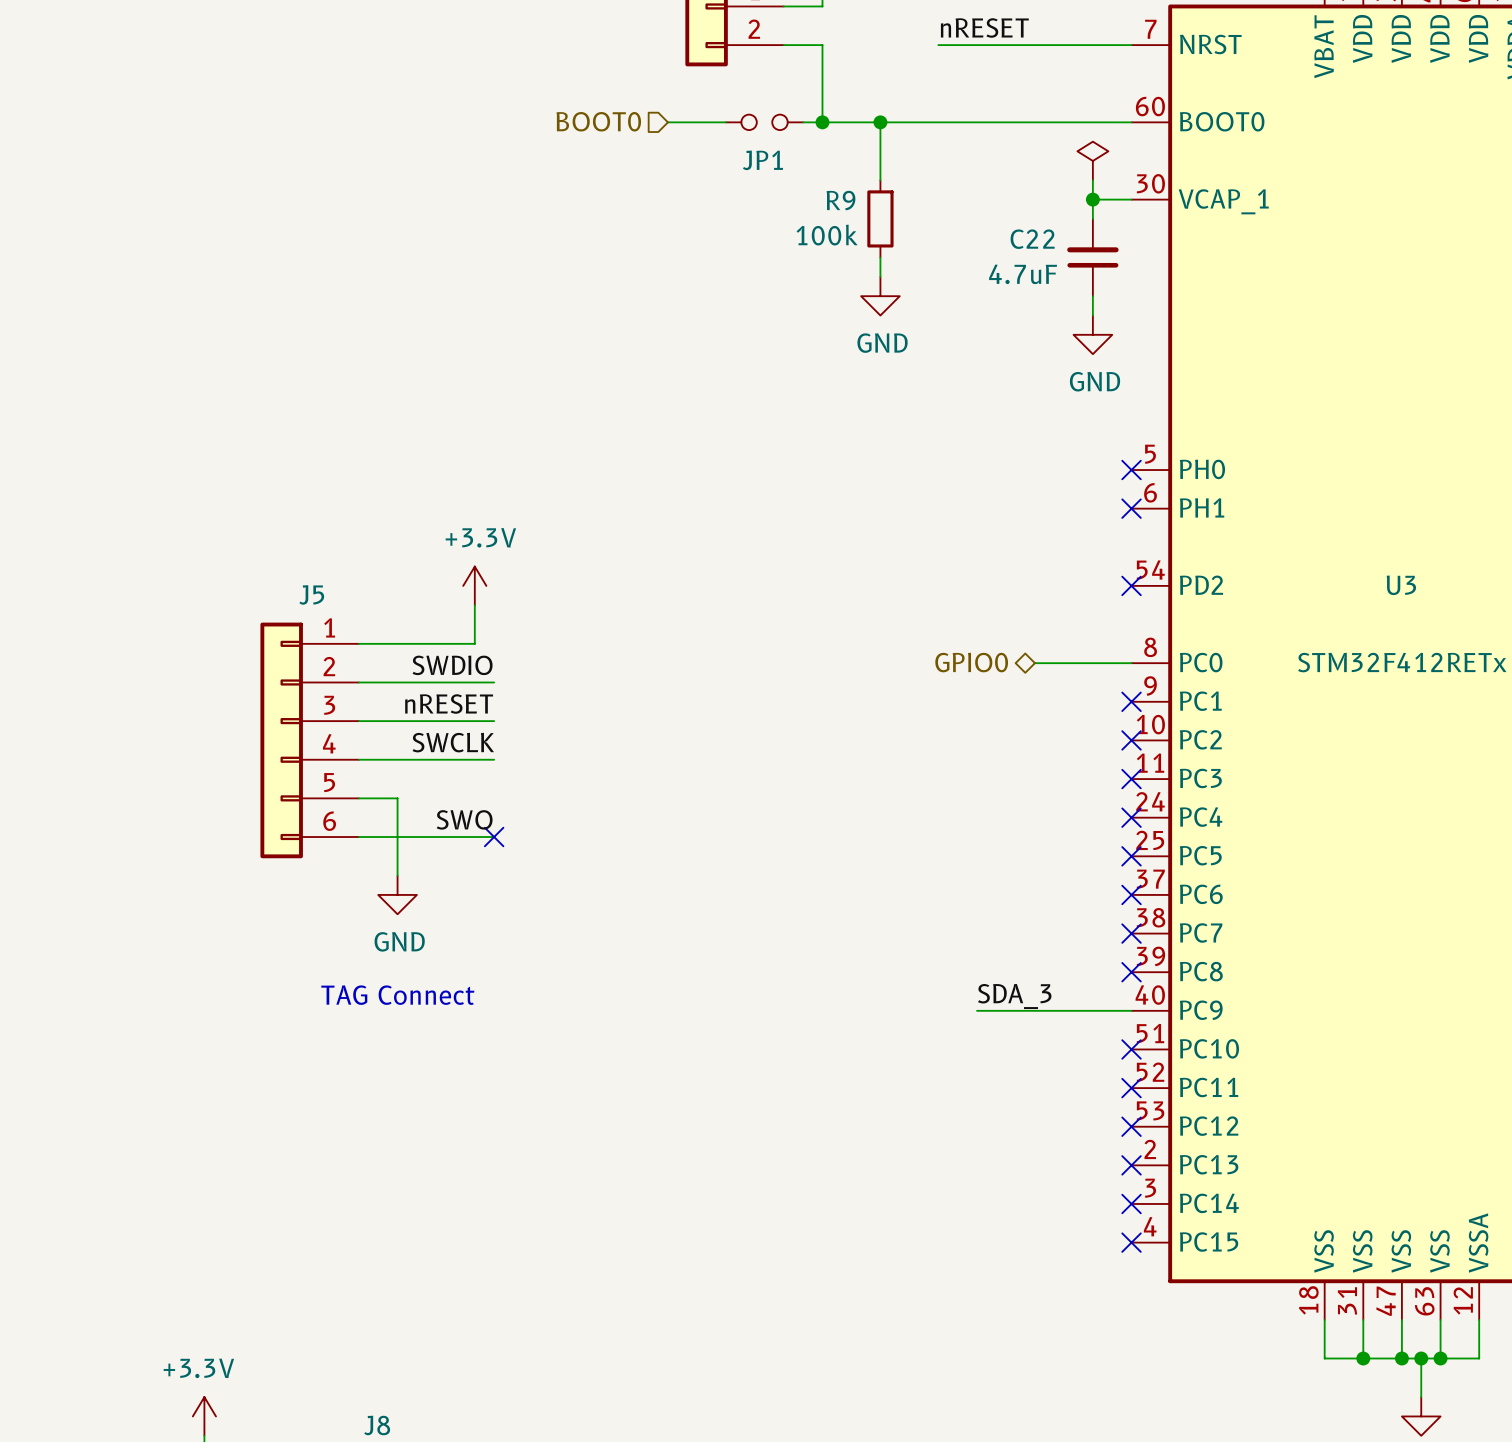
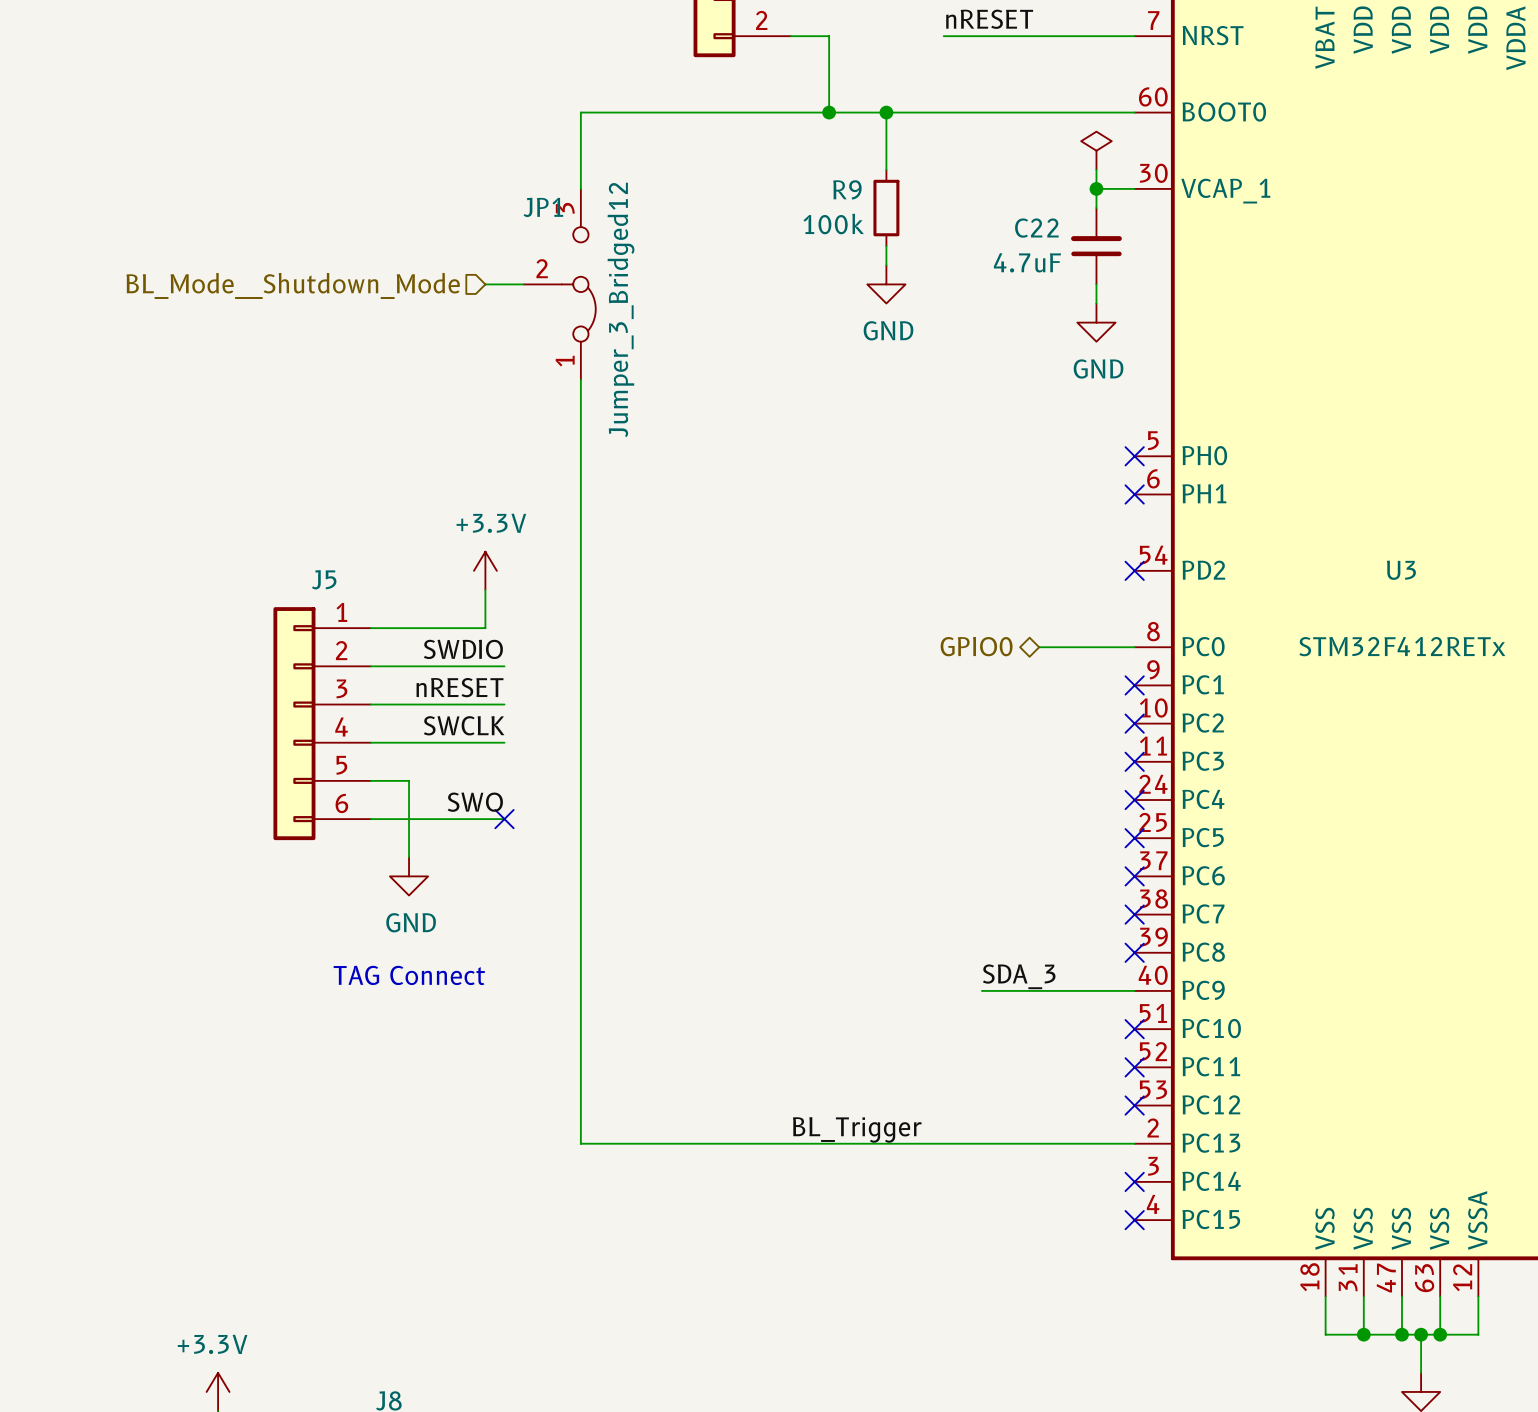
JP1 symbol: [725, 114, 804, 131] -> [523, 188, 596, 380]
hierarchical label: BOOT0 (598, 121) -> none
wire: none -> (676, 112) (580, 112) (580, 188)
wire: none -> (733, 112) (810, 112)
JP1 name position: JP1 (762, 160) -> JP1 (543, 207)
wire: none -> (485, 284) (523, 284)
hierarchical label: none -> BL_Mode__Shutdown_Mode (293, 285)
JP1 value: none -> Jumper_3_Bridged12 (620, 309)
wire: none -> (580, 379) (580, 1143) (1134, 1143)
label: none -> BL_Trigger (857, 1129)
no-connect mark: (1131, 1165) -> none

